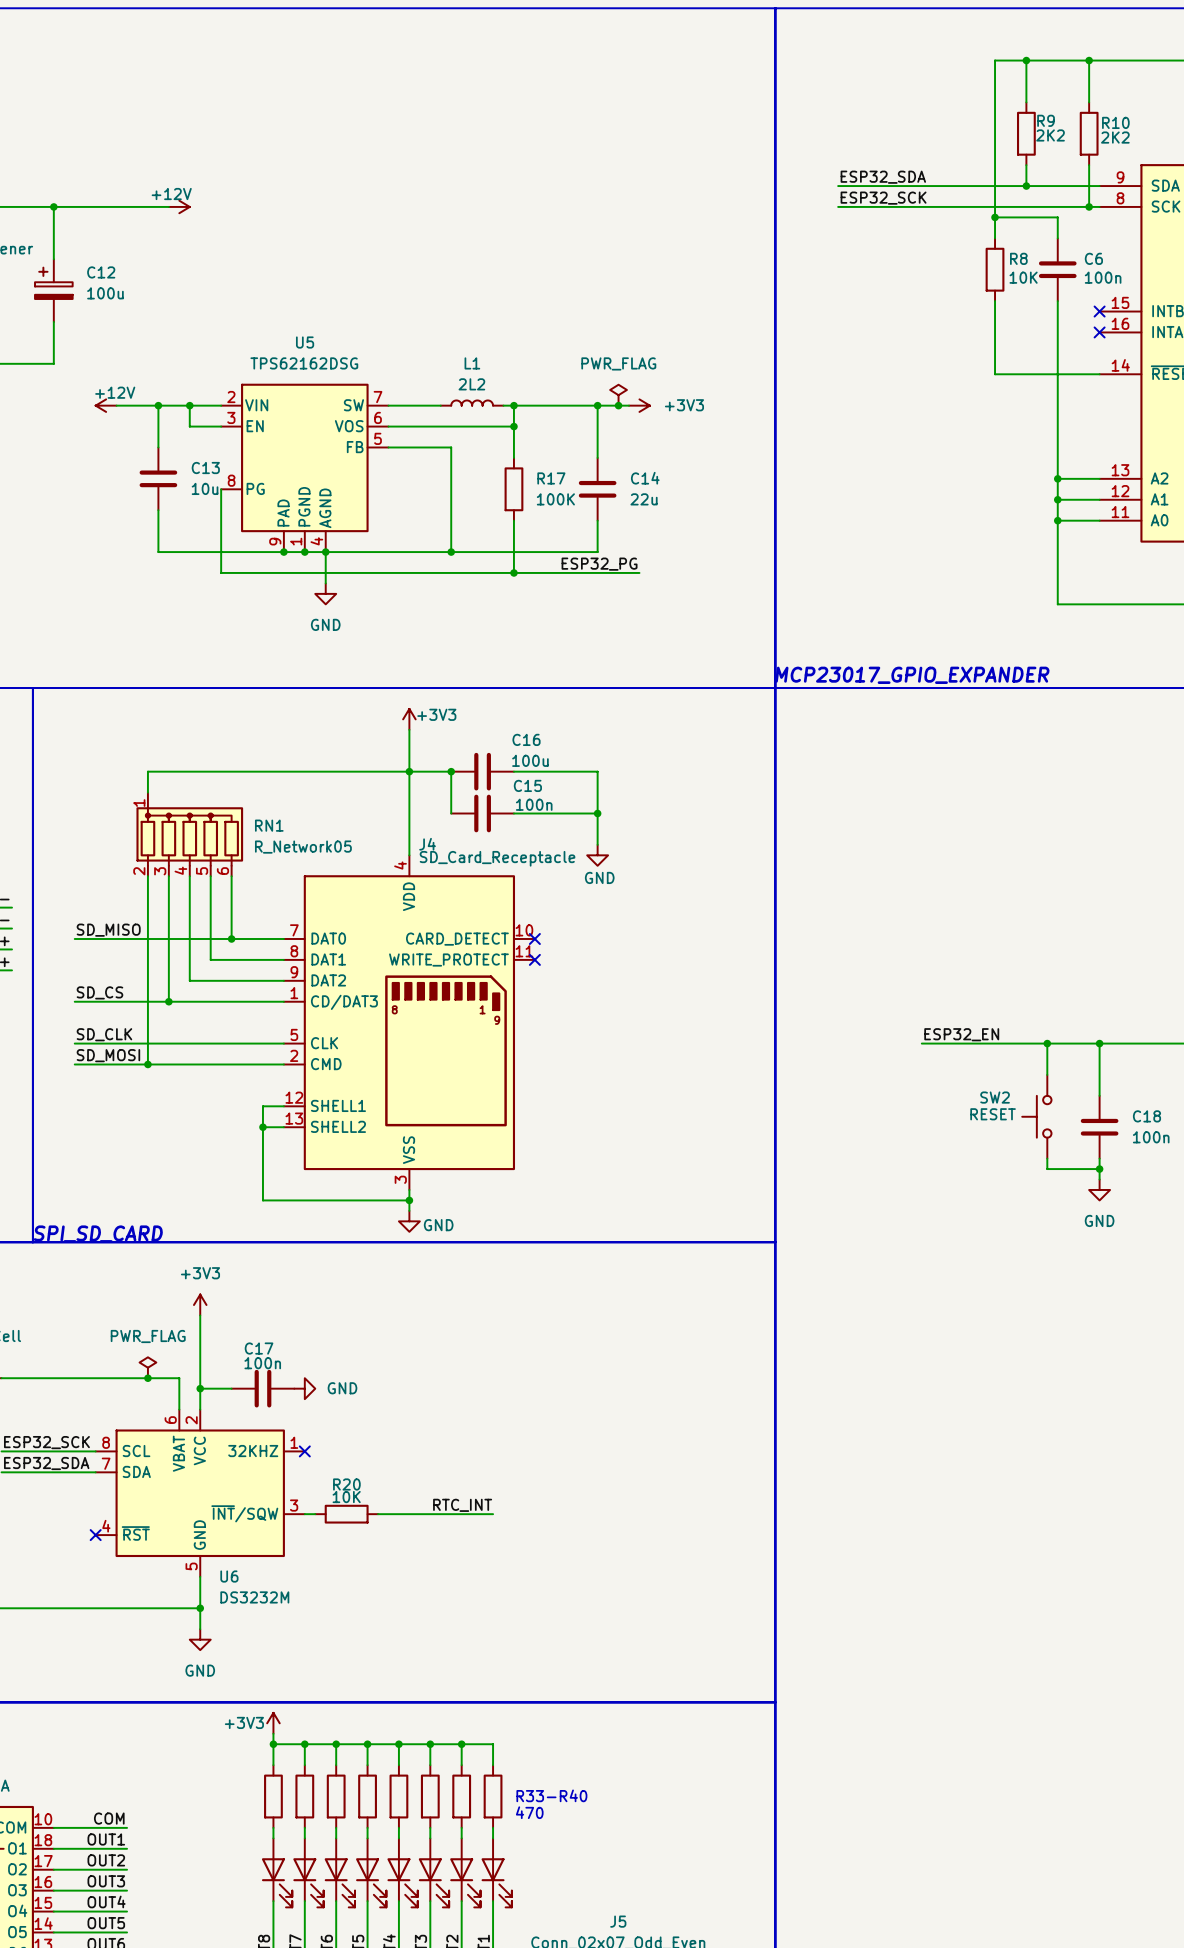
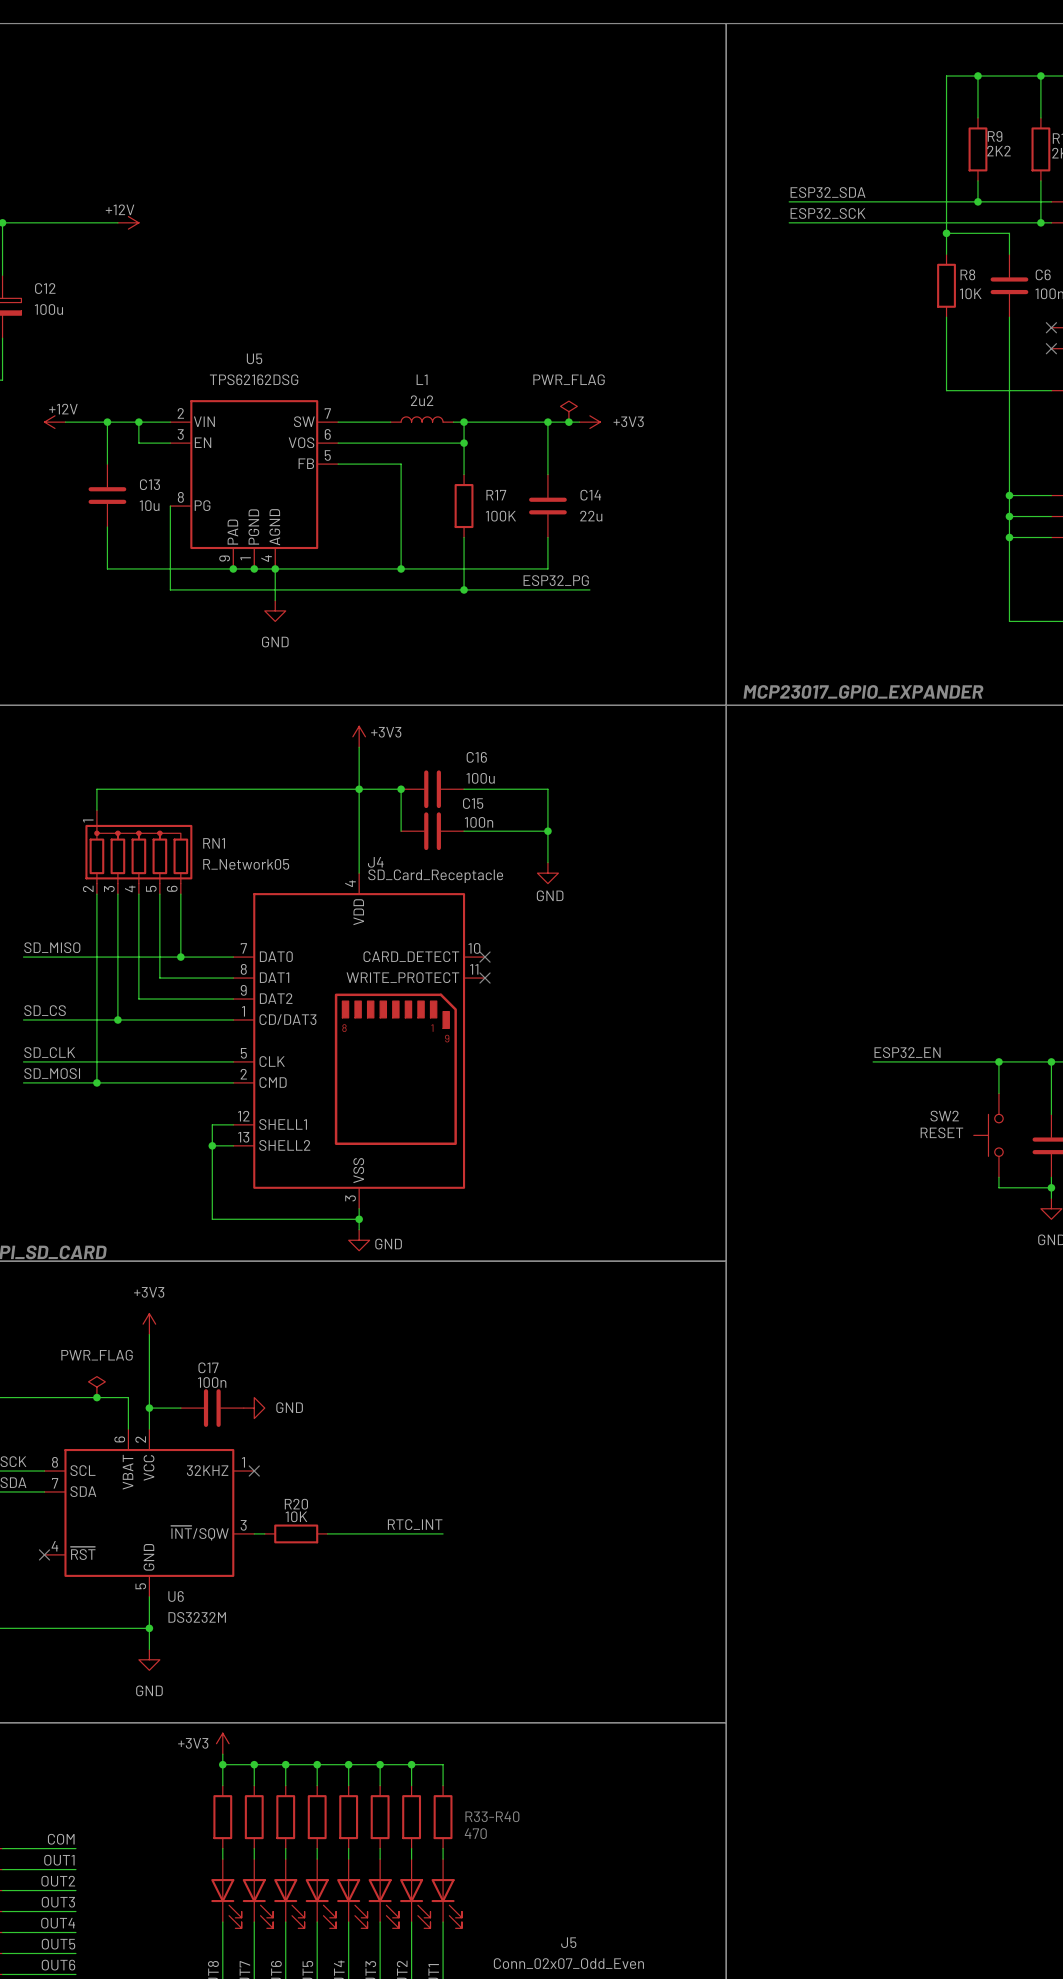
L1 value: 2L2 (471, 384) -> 2u2 (422, 400)

